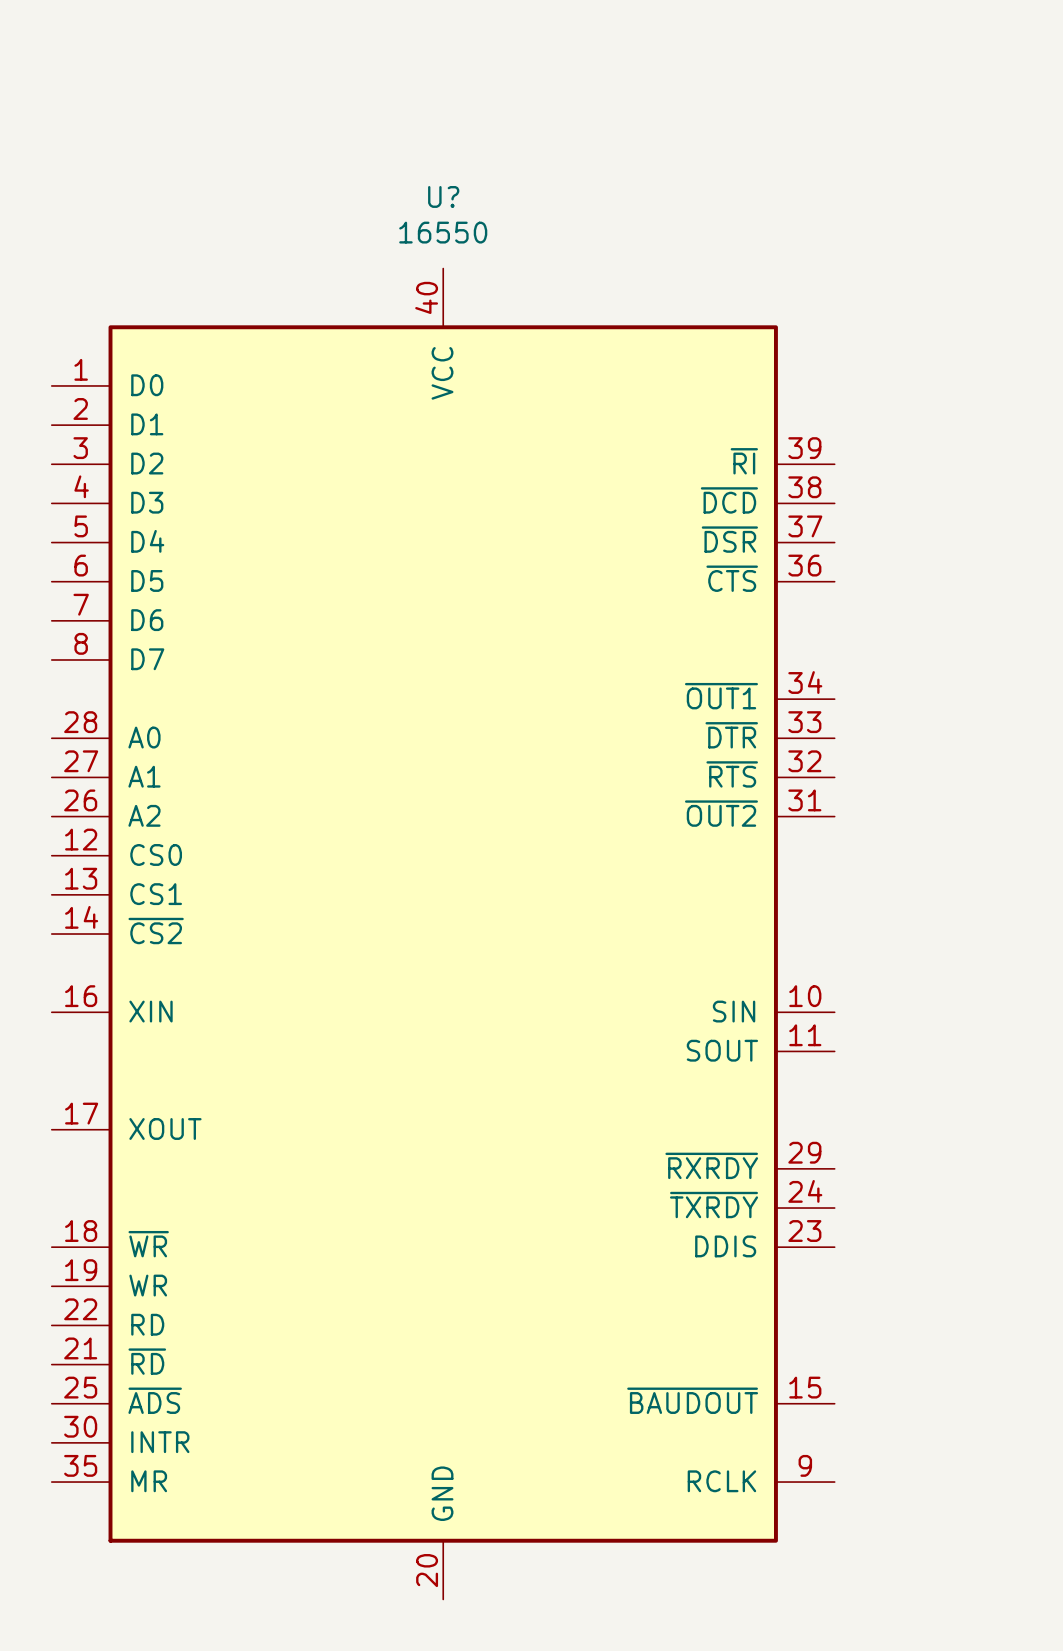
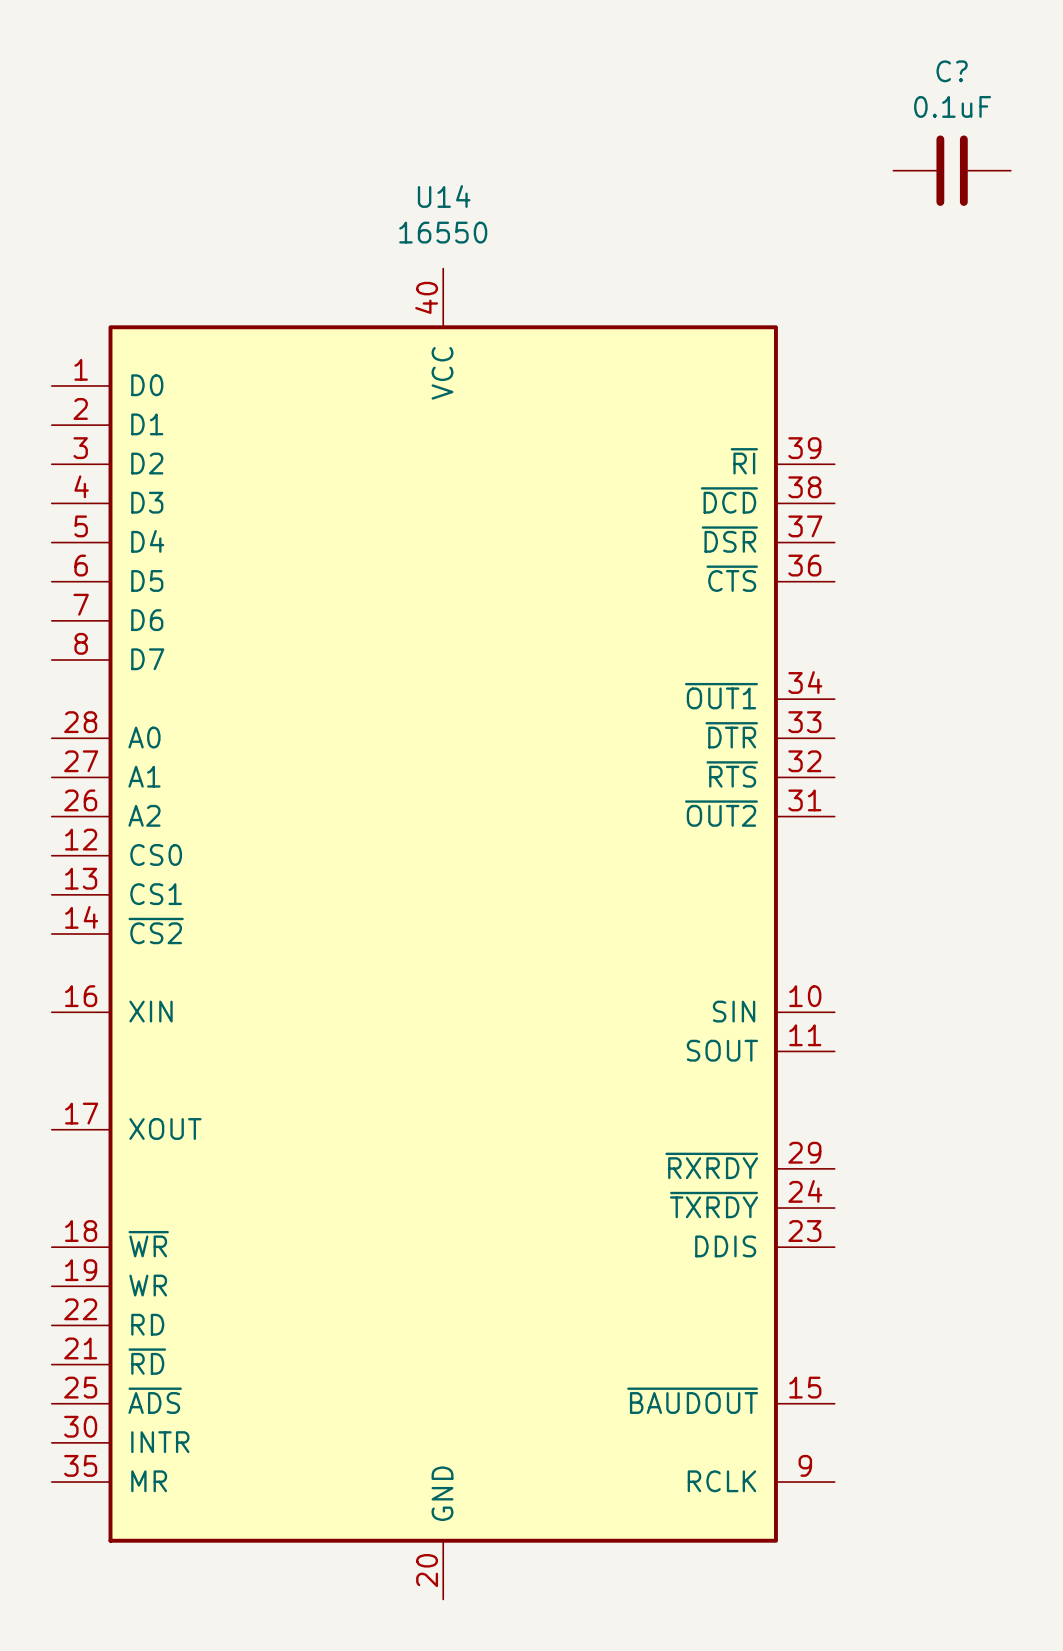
C?: none -> 0.1uF (952, 170)
U? name: U? (443, 196) -> U14 (444, 196)

